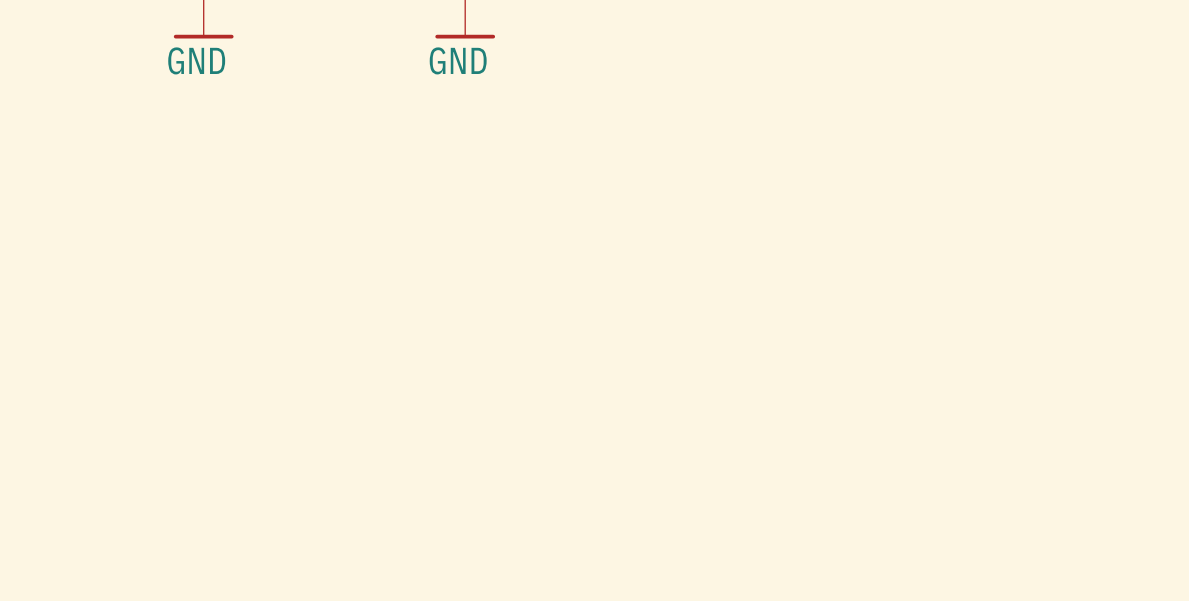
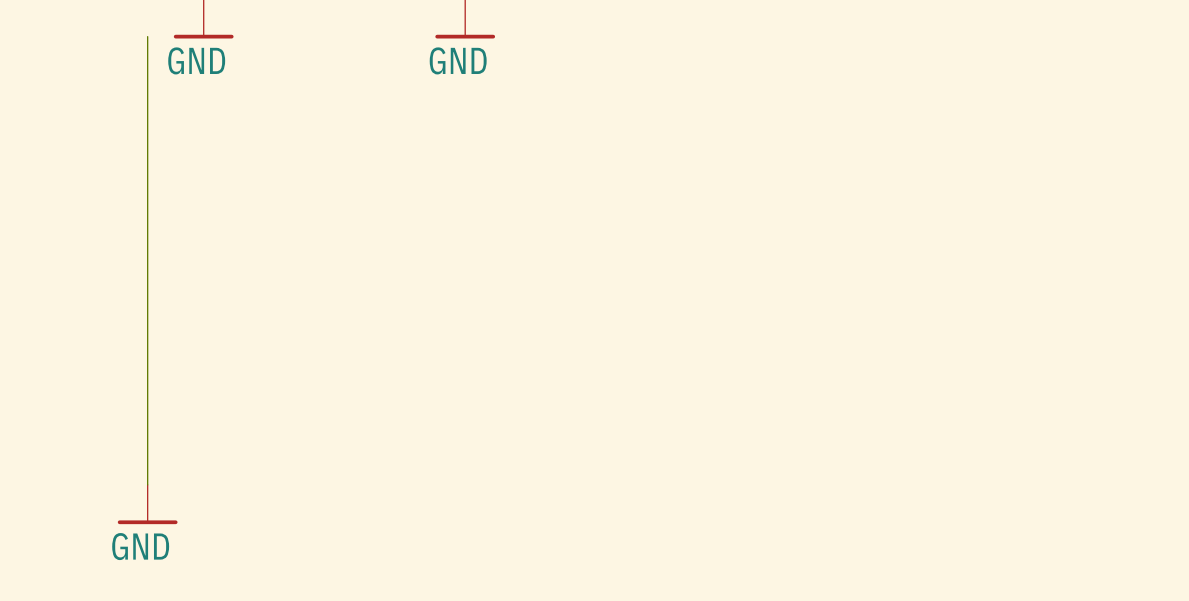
wire: none -> (147, 36) (147, 484)
power symbol: none -> GND (147, 504)

